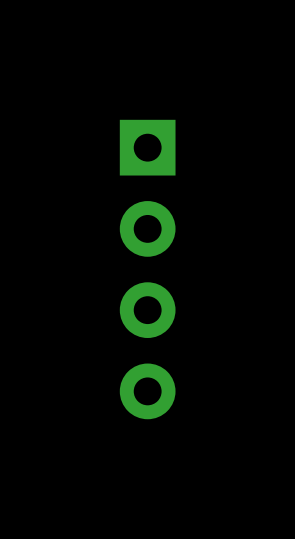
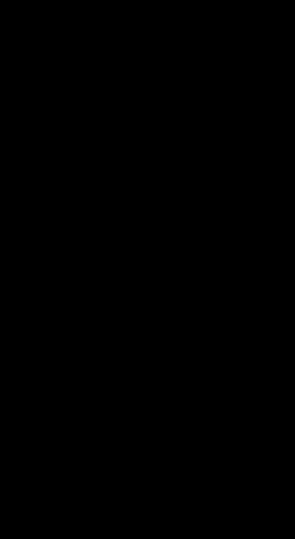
part: (147, 269) -> none

